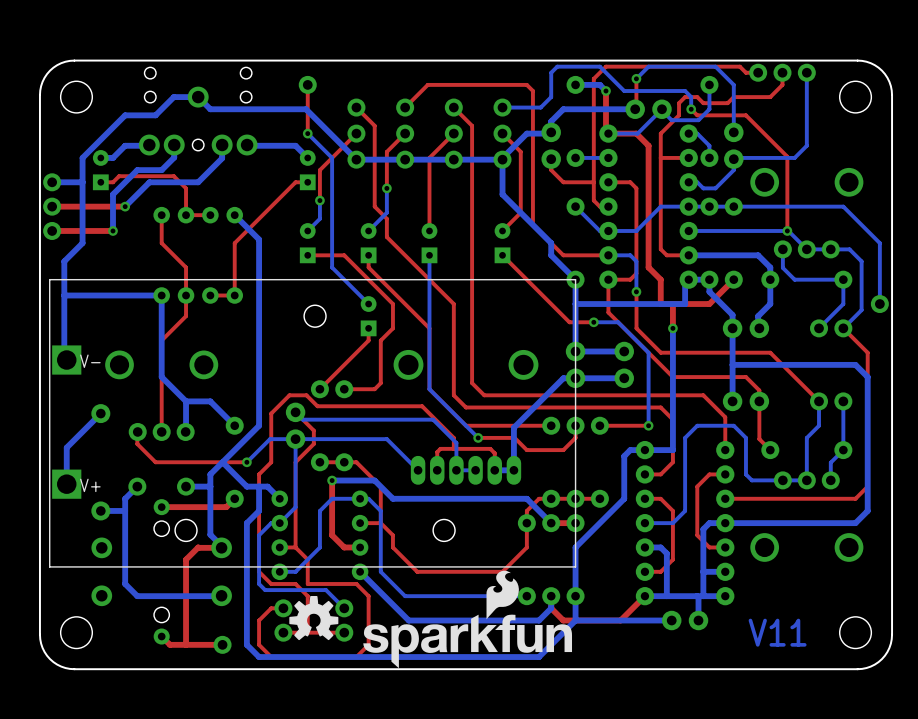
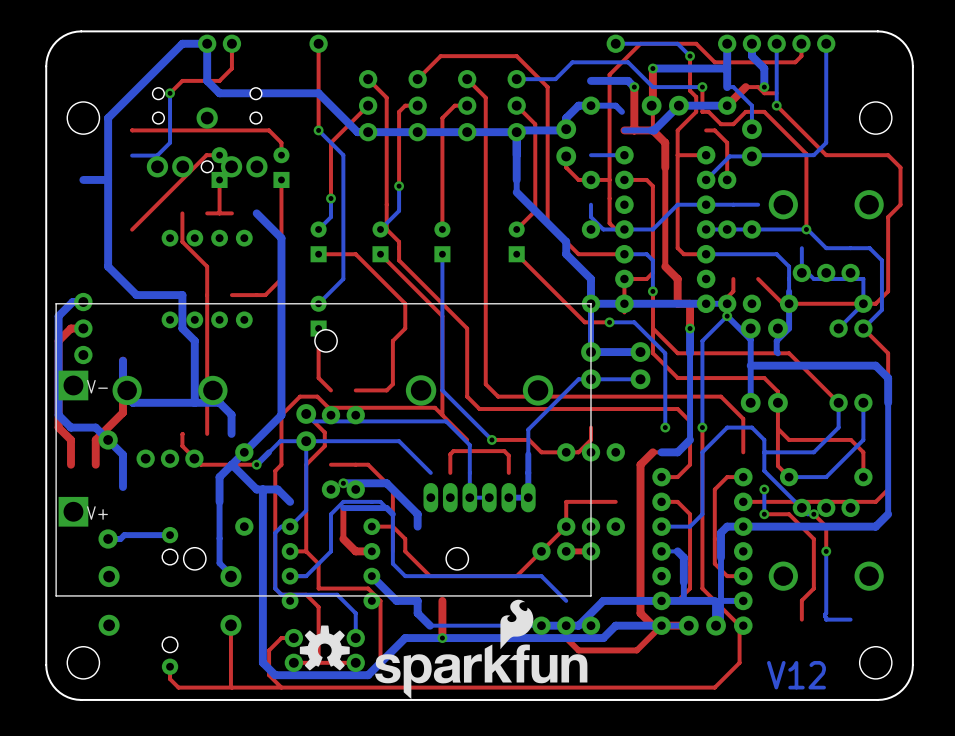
part: none -> (207, 43)
top track: none -> (231, 43) (231, 68) (219, 80) (182, 80) (170, 93)
part: none -> (231, 43)
top track: none -> (318, 43) (318, 105)
part: none -> (318, 43)
bottom track: none -> (615, 43) (677, 43) (690, 56)
part: none -> (615, 43)
part: none -> (727, 43)
bottom track: none -> (751, 43) (751, 56) (764, 68) (764, 87)
part: none -> (751, 43)
bottom track: none -> (776, 43) (776, 105)
part: none -> (776, 43)
part: none -> (801, 43)
bottom track: none -> (826, 43) (826, 93)
part: none -> (826, 43)
top track: none -> (690, 56) (690, 90) (696, 97) (696, 111) (677, 130) (677, 155) (706, 155)
via: none -> (690, 56)
top track: none -> (652, 68) (652, 99)
via: none -> (652, 68)
bottom track: none -> (727, 68) (652, 68)
bottom track: none -> (590, 80) (628, 80) (634, 87)
top track: none -> (634, 87) (634, 130)
via: none -> (634, 87)
bottom track: (648, 66) (636, 78) -> (665, 87) (652, 87) (628, 62) (572, 62) (555, 79) (516, 79)
via: none -> (702, 87)
bottom track: (709, 66) (685, 66) -> (727, 87) (727, 43)
top track: (727, 66) (605, 66) (593, 78) -> (801, 43) (801, 56) (795, 62) (714, 62) (696, 43) (640, 43) (609, 74) (609, 99)
top track: none -> (745, 87) (727, 105)
via: none -> (764, 87)
bottom track: none -> (170, 93) (170, 142) (157, 155) (132, 155)
via: none -> (170, 93)
part: (758, 72) -> none
top track: (782, 72) (782, 84) (770, 97) (733, 97) (727, 103) (715, 103) -> none
part: (782, 72) -> none
part: (806, 72) -> none
via: (636, 78) -> none
part: (307, 84) -> none
part: none -> (368, 105)
top track: none -> (417, 105) (405, 105) (399, 111) (399, 186)
part: none -> (417, 105)
top track: (441, 84) (427, 84) (405, 107) -> none
top track: (453, 84) (526, 84) (532, 91) -> (417, 79) (440, 56) (516, 56) (547, 87) (547, 111)
part: none -> (467, 105)
top track: none -> (516, 105) (535, 124) (535, 210) (516, 229)
part: none -> (516, 105)
bottom track: none -> (590, 105) (578, 105) (566, 118) (564, 130) (518, 130) (516, 132)
bottom track: (709, 84) (709, 109) (698, 120) (671, 120) (661, 109) (637, 133) (608, 133) -> (727, 105) (678, 105) (654, 130) (651, 130)
top track: none -> (776, 105) (826, 155) (888, 155) (900, 167) (900, 204) (888, 217) (888, 291) (875, 303) (782, 303) (758, 279)
via: none -> (776, 105)
top track: (605, 91) (605, 131) (608, 133) (636, 133) (648, 145) -> (624, 130) (652, 130) (665, 142) (665, 167)
via: (605, 91) -> none
board edge: (892, 95) (889, 81) (881, 70) (870, 63) (857, 60) (74, 60) (61, 63) (50, 70) (42, 81) (39, 95) -> (912, 115) (912, 66) (910, 53) (899, 38) (891, 34) (877, 31) (76, 31) (59, 38) (48, 53) (46, 66) (46, 115)
top track: (697, 97) (685, 97) (679, 103) (679, 115) (660, 133) -> (714, 118) (708, 111) (702, 111) (702, 87)
top track: (356, 107) (374, 125) -> (368, 79) (386, 97) (386, 147)
top track: (453, 107) (472, 125) (472, 383) (484, 395) (703, 395) (725, 417) -> (467, 79) (485, 97) (485, 384) (498, 396) (720, 396) (743, 418) (743, 443)
bottom track: (502, 107) (540, 107) (551, 97) (551, 72) (557, 66) (599, 66) (624, 91) (685, 91) (691, 97) (691, 109) -> none
bottom track: (733, 108) (733, 132) -> none
top track: none -> (132, 130) (269, 130) (281, 142) (281, 155)
top track: (307, 109) (307, 133) -> none
via: none -> (318, 130)
bottom track: (608, 109) (563, 109) (551, 121) (549, 133) (526, 133) (502, 157) -> (516, 132) (516, 179)
part position: (648, 109) -> (665, 105)
top track: none -> (706, 130) (714, 130) (727, 142) (727, 179)
top track: (691, 109) (697, 115) (745, 115) (787, 156) -> (733, 124) (745, 111) (764, 111) (806, 153) (806, 178)
via: (691, 109) -> none
bottom track: none -> (516, 132) (357, 132) (318, 93) (219, 93) (207, 80) (207, 43) (182, 43) (108, 118) (108, 266) (136, 295) (182, 295) (182, 328) (194, 340) (194, 402)
bottom track: (806, 121) (806, 145) (794, 157) (735, 157) (733, 170) (715, 188) (703, 188) (697, 182) -> (826, 142) (813, 155) (729, 156) (706, 179)
top track: none -> (219, 155) (206, 155) (132, 229)
bottom track: (307, 133) (332, 157) -> (318, 130) (343, 155) (343, 179)
via: (307, 133) -> none
top track: (356, 133) (319, 170) -> (368, 105) (330, 142) (330, 192)
part: (356, 133) -> none
top track: (405, 133) (386, 151) (386, 188) -> none
part: (405, 133) -> none
top track: (453, 133) (429, 157) -> (454, 105) (442, 118) (442, 179)
part: (453, 133) -> none
top track: (502, 133) (520, 151) (520, 212) (502, 230) -> (609, 322) (584, 322) (516, 254)
part: (502, 133) -> none
bottom track: (688, 133) (697, 133) (709, 145) (709, 157) -> none
bottom track: (149, 145) (125, 145) (113, 157) (100, 157) -> (83, 179) (108, 179)
bottom track: (174, 145) (174, 157) (161, 170) (137, 170) (113, 194) (113, 230) -> none
part: none -> (219, 167)
bottom track: (222, 145) (222, 158) (198, 182) (149, 182) (125, 206) -> none
bottom track: (247, 145) (295, 145) (307, 157) -> none
part: none -> (281, 167)
part position: (551, 145) -> (566, 142)
part position: (733, 145) -> (751, 142)
top track: none -> (219, 179) (219, 213)
top track: none -> (281, 179) (281, 279) (265, 295) (231, 295)
bottom track: (504, 157) (502, 159) (356, 159) (306, 109) (210, 109) (198, 97) (173, 97) (155, 115) (125, 115) (82, 157) (82, 243) (64, 261) (64, 357) (66, 360) -> none
bottom track: (608, 157) (575, 157) -> (624, 155) (590, 155)
top track: (688, 157) (660, 157) -> none
top track: (551, 159) (551, 170) (563, 182) (593, 182) -> (566, 156) (566, 167) (578, 179) (609, 179)
part: (100, 170) -> none
part: (307, 170) -> none
bottom track: (502, 170) (502, 194) (551, 243) (551, 255) (575, 279) -> (516, 192) (566, 241) (566, 254) (590, 279) (590, 303) (706, 303)
top track: (319, 176) (319, 200) -> none
via: none -> (330, 198)
part: (52, 182) -> none
bottom track: (82, 182) (52, 182) -> none
top track: (100, 182) (113, 182) (119, 176) (173, 176) (186, 188) (186, 215) (210, 215) -> none
top track: (307, 182) (295, 182) (234, 243) (234, 295) (210, 295) -> none
top track: (608, 182) (630, 182) (636, 188) -> (624, 179) (646, 179) (652, 186) (652, 210)
bottom track: none -> (706, 204) (677, 204) (652, 229) (603, 229) (590, 217) (590, 204)
bottom track: none -> (758, 204) (714, 204)
bottom track: (386, 188) (386, 212) (368, 230) -> (399, 186) (399, 210) (380, 229)
via position: (386, 188) -> (399, 186)
top track: none -> (182, 213) (182, 241) (207, 266) (207, 433)
top track: none -> (231, 213) (207, 213)
bottom track: (319, 200) (319, 218) (307, 230) -> (330, 198) (330, 217) (318, 229)
via: (319, 200) -> none
top track: (532, 200) (532, 224) (563, 255) (608, 255) -> (547, 223) (578, 254) (624, 254)
part: (52, 206) -> none
top track: (125, 206) (52, 206) -> none
via: (125, 206) -> none
top track: (429, 206) (429, 230) -> none
bottom track: (575, 206) (599, 230) (608, 230) -> none
bottom track: (688, 206) (660, 206) (636, 230) (630, 230) -> none
top track: (787, 206) (787, 230) -> none
bottom track: (788, 206) (843, 206) (879, 243) (879, 304) -> none
top track: (161, 215) (161, 243) (186, 267) (186, 316) (161, 340) (161, 431) -> none
bottom track: (234, 215) (259, 239) (259, 425) -> (430, 472) (399, 441) (280, 441) (269, 452)
part: none -> (318, 241)
top track: (660, 224) (660, 249) (666, 255) (688, 255) -> (677, 248) (683, 254) (706, 254)
part: (52, 230) -> none
top track: (113, 230) (52, 230) -> none
via: (113, 230) -> none
bottom track: none -> (442, 254) (442, 279)
bottom track: (758, 230) (788, 230) (806, 249) (849, 249) (861, 261) -> (807, 229) (826, 248) (869, 248) (881, 260) (881, 285)
via position: (787, 230) -> (806, 229)
part: (307, 243) -> none
part position: (368, 243) -> (380, 241)
part position: (429, 243) -> (442, 241)
part position: (502, 243) -> (516, 241)
top track: (648, 243) (648, 267) (660, 279) (660, 304) (709, 304) (733, 279) -> (665, 266) (677, 279) (677, 303) (690, 303) (690, 328)
top track: (636, 249) (636, 273) (630, 279) (608, 279) -> (652, 272) (646, 279) (624, 279) (624, 303)
bottom track: (782, 249) (782, 267) (794, 279) (843, 279) (843, 304) (819, 328) -> (801, 248) (801, 267) (813, 279) (863, 279) (863, 303) (838, 328)
top track: (307, 255) (344, 255) (392, 304) (392, 328) (380, 340) -> (318, 254) (355, 254) (405, 303) (405, 328) (392, 340) (392, 365)
bottom track: (332, 255) (332, 267) (368, 304) -> (343, 279) (318, 303)
top track: (368, 255) (368, 267) (429, 328) -> (380, 254) (442, 316) (442, 353)
top track: (502, 255) (569, 322) (593, 322) -> none
bottom track: (608, 255) (630, 255) (636, 261) -> (646, 254) (652, 260) (652, 285)
bottom track: (688, 255) (758, 255) (770, 267) -> (776, 254) (789, 266) (789, 291)
top track: none -> (733, 279) (733, 291) (727, 297) (727, 316)
bottom track: (636, 267) (636, 291) -> (690, 328) (690, 353)
via: none -> (652, 291)
bottom track: none -> (83, 302) (72, 302) (58, 316) (58, 415) (70, 427) (95, 427) (122, 454) (122, 487)
bottom track: (688, 279) (685, 283) (685, 304) (575, 304) -> none
bottom track: (861, 285) (861, 310) (843, 328) -> (881, 309) (863, 328)
top track: (608, 288) (608, 312) (672, 377) (745, 377) (759, 390) -> none
part: none -> (318, 316)
via: (636, 291) -> none
bottom track: none -> (727, 316) (702, 340) (702, 427)
via: none -> (727, 316)
bottom track: (64, 295) (161, 295) (161, 377) (186, 401) -> none
via: none -> (609, 322)
top track: none -> (83, 328) (70, 328) (58, 340) (58, 427) (70, 439) (70, 464)
part: none -> (83, 328)
top track: none -> (318, 328) (318, 378) (330, 390)
top track: none -> (653, 328) (677, 353) (789, 353) (838, 402)
top track: (672, 304) (672, 328) -> (653, 291) (653, 316)
via: none -> (690, 328)
part: none -> (764, 328)
part: none -> (838, 328)
part: none -> (863, 328)
part: (879, 304) -> none
part: (368, 316) -> none
bottom track: (593, 322) (618, 322) (648, 352) -> (609, 322) (634, 322) (665, 353) (665, 378)
via: (593, 322) -> none
bottom track: (575, 327) (575, 351) (624, 351) -> (590, 352) (640, 352)
top track: (368, 328) (368, 340) (319, 389) -> none
via: (672, 328) -> none
part: (745, 328) -> none
part: (819, 328) -> none
top track: (843, 328) (867, 352) -> (863, 328) (888, 353) (888, 378)
part: (843, 328) -> none
bottom track: none -> (122, 360) (122, 392) (132, 402) (219, 402) (231, 414) (231, 433)
top track: none -> (122, 360) (122, 412) (95, 439) (95, 464)
top track: (745, 352) (770, 352) (819, 401) -> (764, 378) (777, 391) (777, 416)
top track: (380, 358) (380, 383) (374, 389) (344, 389) -> (392, 384) (386, 390) (355, 390)
bottom track: (429, 364) (429, 389) (478, 437) -> (442, 390) (491, 439)
part position: (575, 364) -> (590, 365)
part position: (624, 364) -> (640, 365)
bottom track: (732, 364) (855, 364) (867, 377) -> (750, 365) (875, 365) (888, 378) (888, 402)
top track: (453, 370) (453, 395) (466, 407) (660, 407) (672, 419) -> (467, 396) (479, 409) (677, 409) (690, 421) (690, 446)
bottom track: (732, 377) (732, 401) -> (863, 402) (863, 427)
part: none -> (764, 402)
bottom track: none -> (838, 402) (838, 427) (813, 452) (764, 452)
part: none -> (838, 402)
part: none -> (863, 402)
bottom track: (624, 378) (563, 378) (513, 427) -> (640, 379) (578, 379) (528, 429) (528, 454)
bottom track: (186, 401) (210, 401) (234, 425) -> none
bottom track: (186, 401) (185, 431) -> none
top track: none -> (590, 427) (590, 439) (578, 452) (566, 452)
bottom track: (648, 401) (648, 425) -> none
via: none -> (665, 427)
via: none -> (702, 427)
part: (745, 401) -> none
bottom track: (819, 401) (819, 425) (806, 437) (806, 480) (751, 480) (745, 474) -> (764, 514) (764, 501)
part: (819, 401) -> none
part: (843, 401) -> none
top track: none -> (777, 428) (789, 439) (851, 439) (863, 452) (863, 477)
top track: none -> (182, 433) (182, 446) (200, 464) (256, 464)
bottom track: (295, 412) (302, 419) (433, 419) (456, 442) -> (306, 413) (313, 421) (446, 421) (469, 445) (469, 469)
top track: (295, 412) (313, 430) (313, 444) (295, 462) -> (306, 413) (324, 432) (324, 446) (306, 464) (306, 489)
bottom track: (100, 413) (66, 447) (66, 484) -> none
top track: (271, 413) (289, 395) (306, 395) (317, 406) (422, 406) (453, 437) (453, 448) -> (281, 439) (281, 415) (300, 396) (317, 396) (328, 407) (434, 407) (442, 415)
top track: (453, 413) (466, 425) (526, 425) -> (491, 439) (529, 439) (541, 452)
bottom track: (672, 413) (672, 450) (630, 450) (624, 456) (624, 498) (575, 547) (575, 620) -> (690, 439) (677, 452) (661, 452)
bottom track: (843, 413) (843, 450) (830, 462) (830, 480) -> (863, 439) (826, 477) (789, 477)
bottom track: none -> (306, 441) (306, 465)
part position: (295, 425) -> (306, 427)
top track: (575, 425) (575, 437) (563, 450) (526, 450) (514, 437) (478, 437) -> none
top track: (636, 425) (599, 425) -> (652, 452) (640, 464) (640, 613) (652, 625) (688, 625)
via: (648, 425) -> none
top track: (725, 425) (725, 450) -> none
top track: (137, 431) (137, 444) (155, 462) (246, 462) -> none
bottom track: (246, 437) (210, 474) -> (256, 213) (281, 238) (281, 415) (219, 477) (219, 501)
top track: (271, 437) (271, 462) (259, 474) (259, 571) (271, 583) (295, 583) (307, 596) -> (281, 464) (275, 470) (275, 588) (281, 594) (306, 594) (318, 607)
via position: (478, 437) -> (491, 439)
top track: (672, 437) (672, 462) (660, 474) -> (690, 464) (677, 477) (661, 477)
bottom track: (745, 437) (733, 425) (697, 425) (685, 437) -> (764, 464) (764, 439) (751, 427) (727, 427) (702, 452) (702, 464)
bottom track: (745, 444) (745, 462) -> (764, 470) (807, 514) (813, 514)
bottom track: none -> (343, 483) (386, 483) (417, 514) (417, 526)
bottom track: (222, 462) (246, 486) (267, 486) (279, 498) -> (231, 464) (256, 489) (277, 489) (290, 501)
bottom track: (246, 462) (270, 439) (386, 439) (418, 470) -> none
via position: (246, 462) -> (256, 464)
bottom track: none -> (262, 489) (262, 662) (275, 675) (368, 675) (405, 638) (603, 638) (615, 625) (661, 625)
top track: (319, 462) (356, 462) (380, 486) -> (330, 464) (368, 464) (392, 489) (392, 514)
via: none -> (764, 489)
top track: (867, 462) (867, 486) (855, 498) (725, 498) -> (888, 489) (875, 501) (743, 501)
top track: (494, 470) (494, 453) (490, 448) (440, 448) (437, 452) (437, 470) -> (508, 472) (508, 455) (504, 451) (453, 451) (450, 454) (450, 472)
top track: none -> (615, 501) (566, 501) (566, 526) (516, 576) (430, 576) (405, 551) (405, 539) (392, 526) (371, 526)
top track: (725, 474) (709, 474) (697, 486) -> (743, 477) (727, 477) (714, 489) (714, 514)
via position: (332, 480) -> (343, 483)
bottom track: (295, 482) (295, 507) (279, 523) (271, 523) (259, 535) (259, 583) (265, 590) (326, 590) (344, 608) -> (306, 510) (290, 526) (281, 526) (275, 532) (275, 588) (281, 594) (337, 594) (355, 613) (355, 631)
bottom track: (137, 486) (125, 498) (125, 583) (137, 596) (221, 595) -> none
part: (137, 486) -> none
part: (186, 486) -> none
bottom track: (210, 486) (186, 486) -> none
bottom track: (259, 486) (259, 510) (246, 523) (246, 644) (259, 657) (539, 657) (575, 620) -> none
bottom track: (380, 486) (392, 498) (526, 498) (551, 523) -> (392, 514) (392, 539)
bottom track: (685, 486) (685, 510) (672, 523) (660, 523) -> (702, 514) (690, 526) (661, 526)
top track: none -> (764, 514) (789, 514) (813, 539) (813, 588) (801, 600) (801, 619)
via: none -> (764, 514)
top track: none -> (813, 514) (826, 526) (826, 551)
via: none -> (813, 514)
bottom track: (867, 486) (867, 510) (855, 523) (709, 523) (703, 529) -> (888, 514) (875, 526) (727, 526) (720, 532) (720, 557)
top track: (234, 498) (226, 507) (161, 507) -> none
top track: (599, 498) (539, 498) (526, 510) (526, 547) (502, 571) (417, 571) (392, 547) (392, 535) (380, 523) (360, 523) -> none
top track: (644, 498) (660, 498) (672, 510) -> (677, 501) (690, 514) (690, 539)
bottom track: (125, 510) (113, 510) -> (170, 535) (124, 535) (120, 539)
top track: (332, 510) (332, 535) (344, 547) (360, 547) -> (343, 539) (355, 551) (371, 551)
bottom track: (380, 510) (368, 498) (332, 498) (319, 510) -> (386, 508) (380, 501) (343, 501) (330, 514) (330, 539)
top track: none -> (290, 551) (306, 551) (318, 563) (318, 588) (368, 588) (380, 600) (380, 625)
top track: (295, 523) (295, 547) (307, 559) (307, 577) -> none
bottom track: (319, 523) (319, 547) (295, 571) (279, 571) -> (330, 551) (306, 576) (290, 576)
bottom track: none -> (826, 551) (825, 616) (826, 619) (850, 619)
via: none -> (826, 551)
bottom track: (380, 535) (380, 571) (405, 596) (417, 596) -> (371, 576) (396, 600) (417, 600) (417, 613) (430, 625)
bottom track: none -> (392, 563) (405, 576) (541, 576) (566, 600)
top track: (221, 547) (198, 547) (186, 559) (186, 644) -> none
bottom track: (644, 547) (660, 547) (666, 553) -> (677, 551) (683, 557) (683, 582)
bottom track: (360, 571) (408, 620) (539, 620) (551, 608) (551, 596) -> none
top track: none -> (442, 600) (442, 638)
bottom track: (666, 571) (666, 596) -> none
top track: (307, 583) (356, 583) (368, 596) -> (318, 613) (318, 625)
top track: none -> (230, 625) (231, 687)
bottom track: (697, 596) (698, 620) -> none
bottom track: none -> (716, 625) (714, 600) (603, 600) (578, 625) (541, 625)
bottom track: (725, 596) (671, 596) -> none
via: none -> (442, 638)
bottom track: (671, 620) (575, 620) -> none
part position: (685, 620) -> (702, 625)
top track: (368, 632) (368, 644) (356, 657) -> (702, 427) (702, 588) (739, 625) (739, 662) (714, 687) (368, 687)
text: V11 (777, 632) -> V12 (796, 675)
top track: (161, 636) (170, 644) (222, 644) -> (170, 666) (170, 679) (178, 687) (281, 687)
part: (222, 644) -> none

